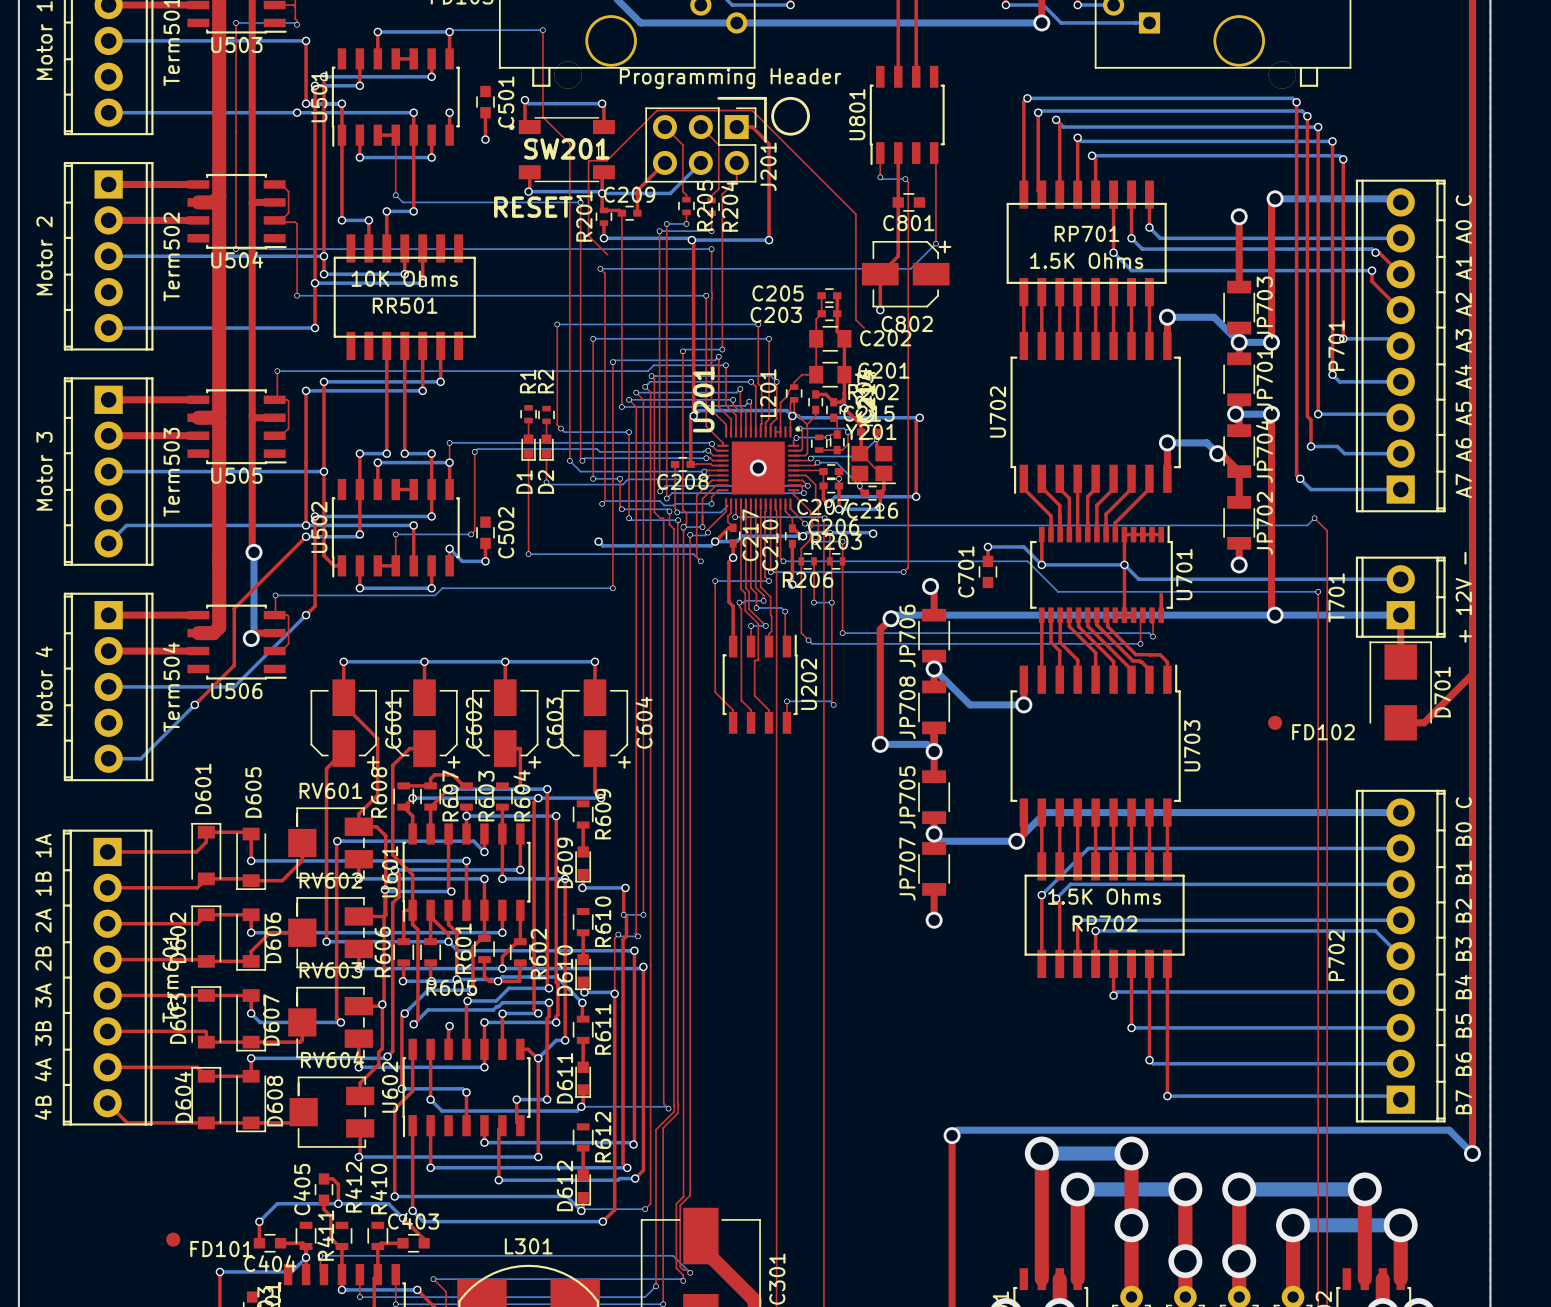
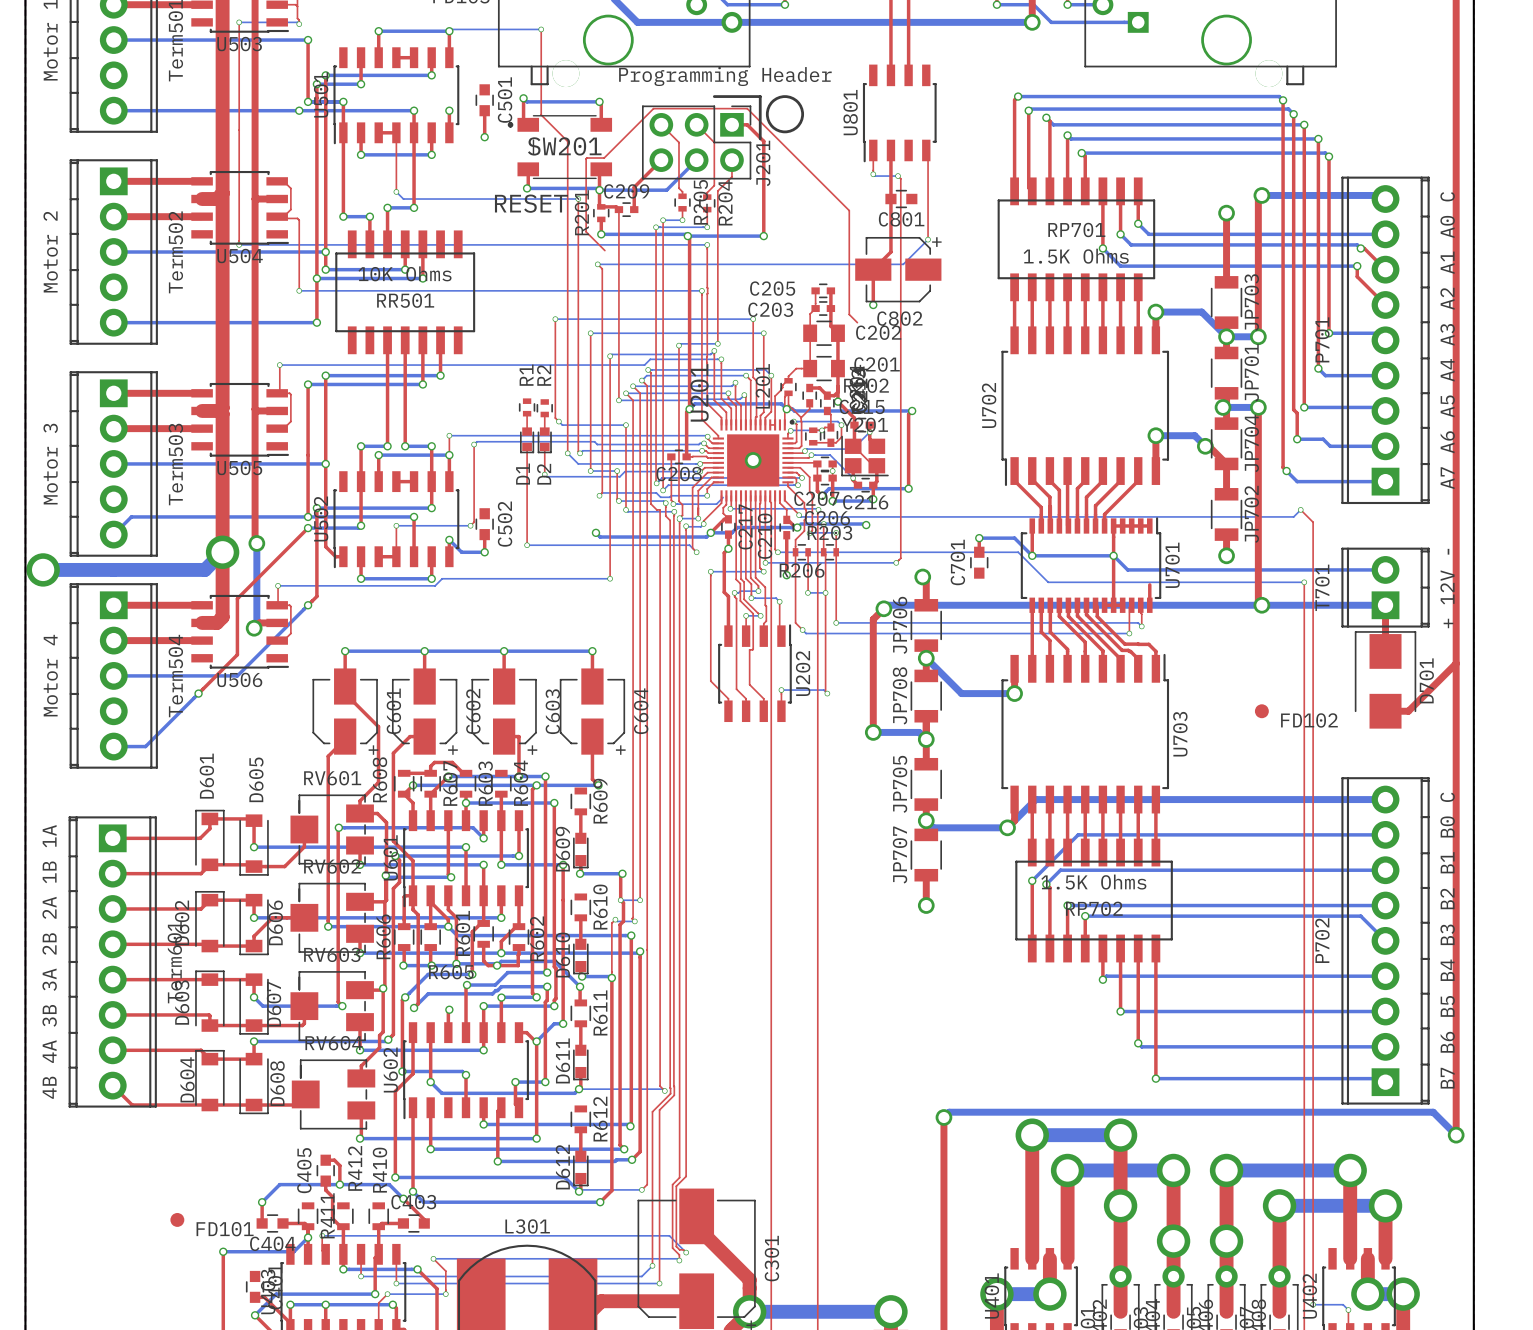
bottom track: none -> (222, 552) (204, 569) (43, 569)
via: none -> (222, 552)
via: none -> (43, 569)

